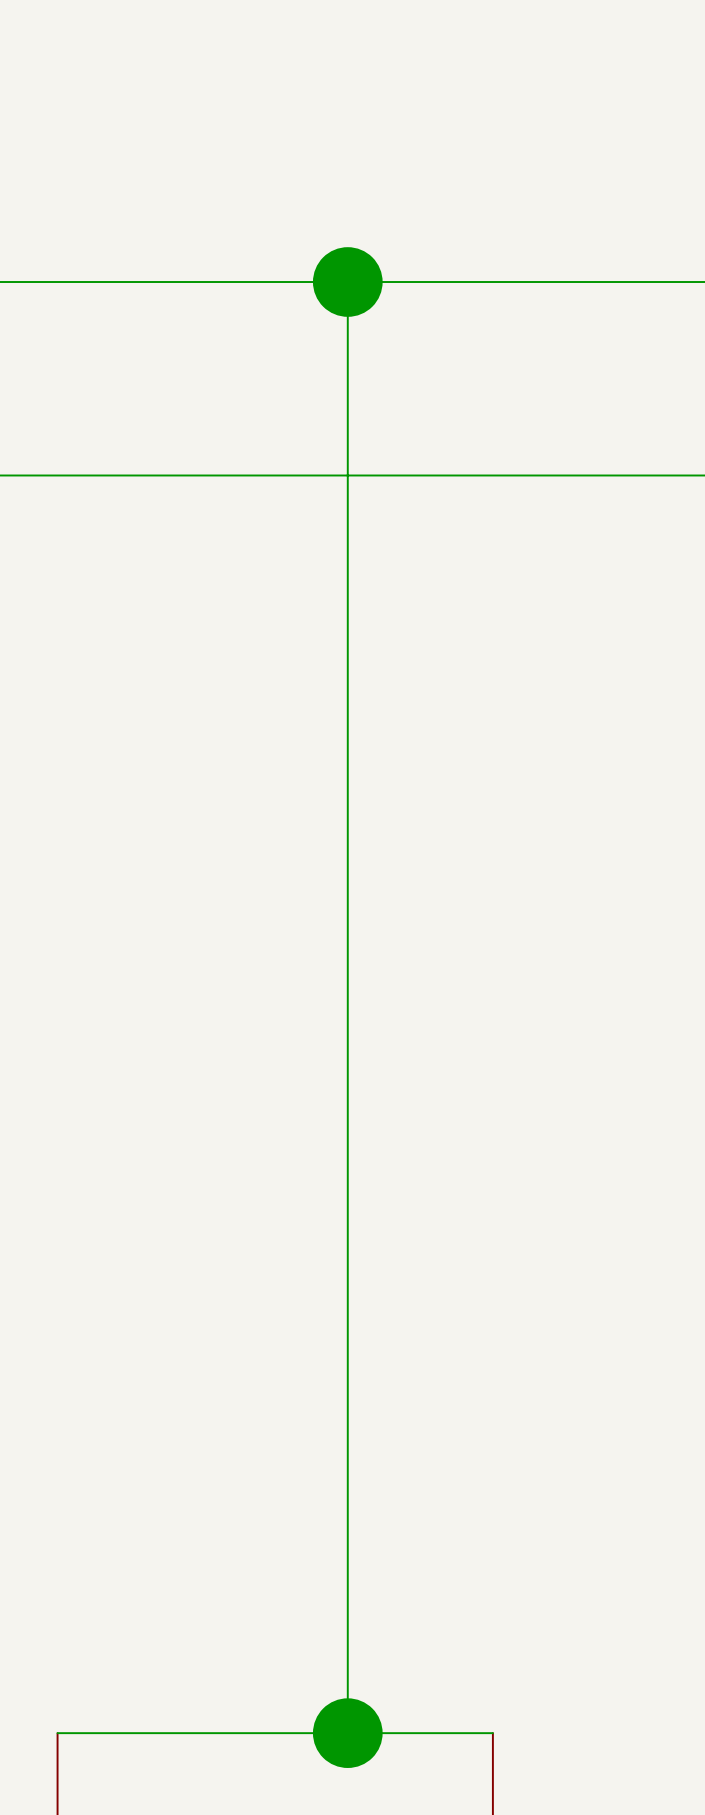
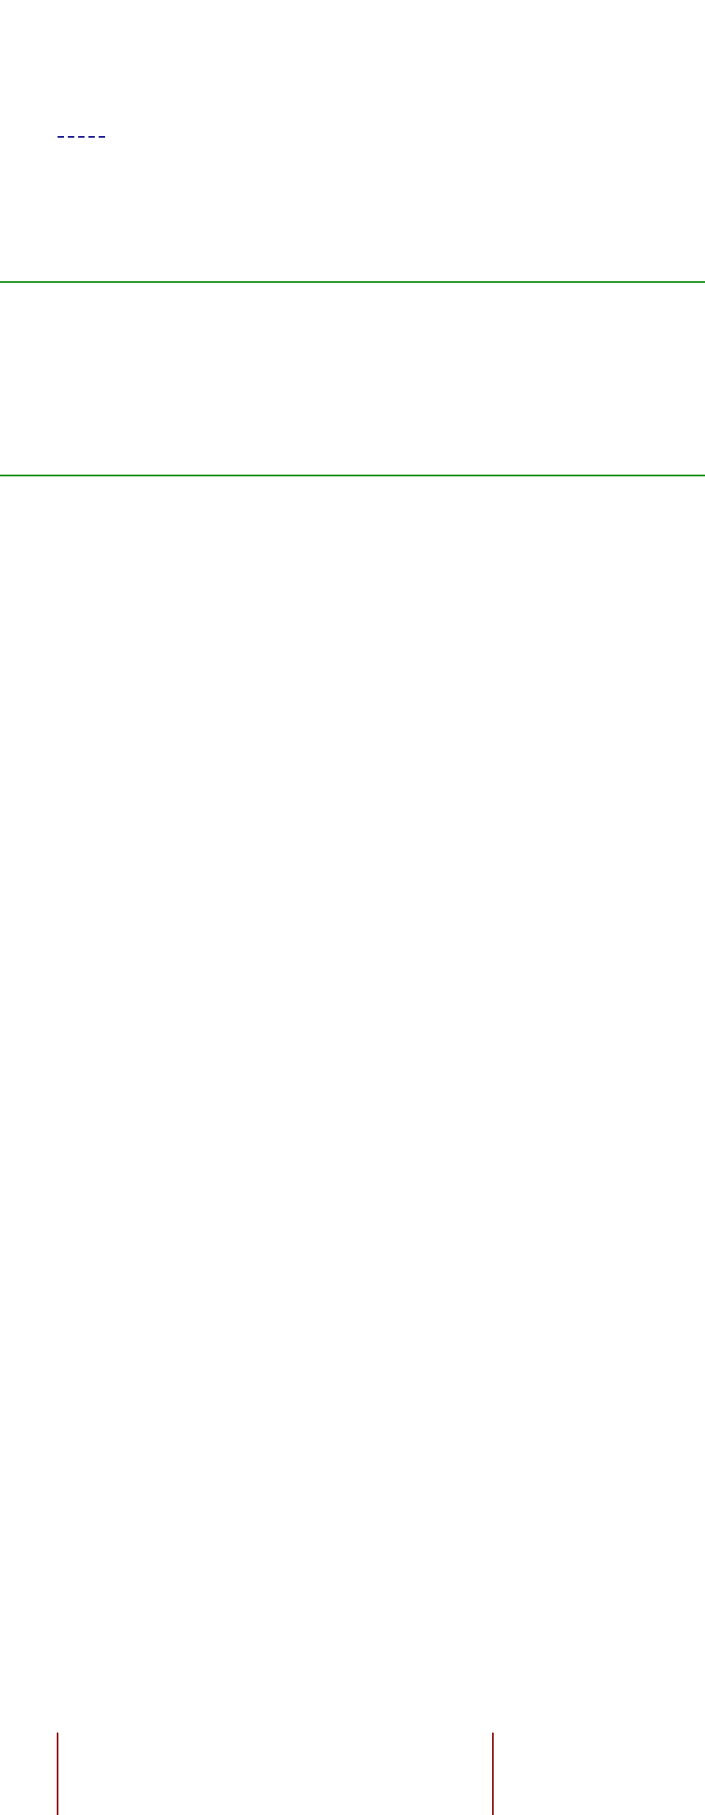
line: none -> (57, 136) (105, 136)
wire: (347, 282) (347, 1733) -> none
junction: (347, 282) -> none
wire: (57, 1733) (492, 1733) -> none
junction: (347, 1733) -> none

